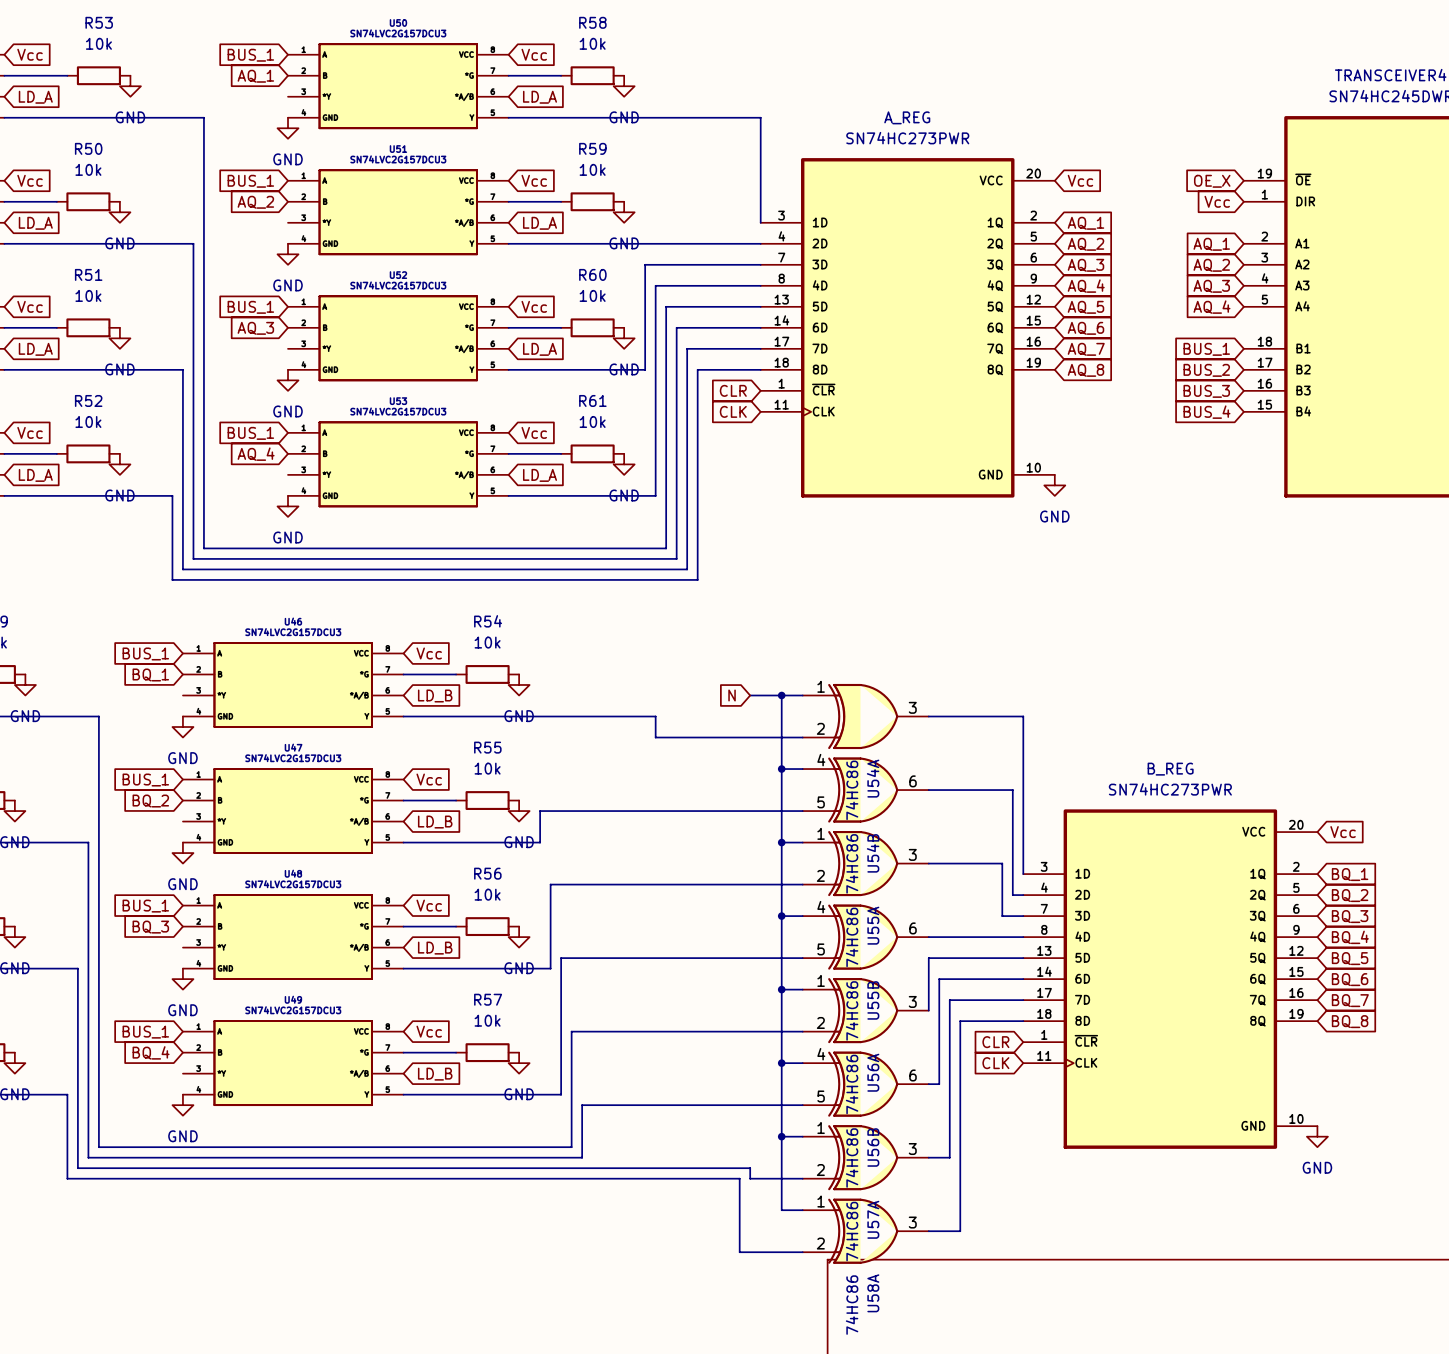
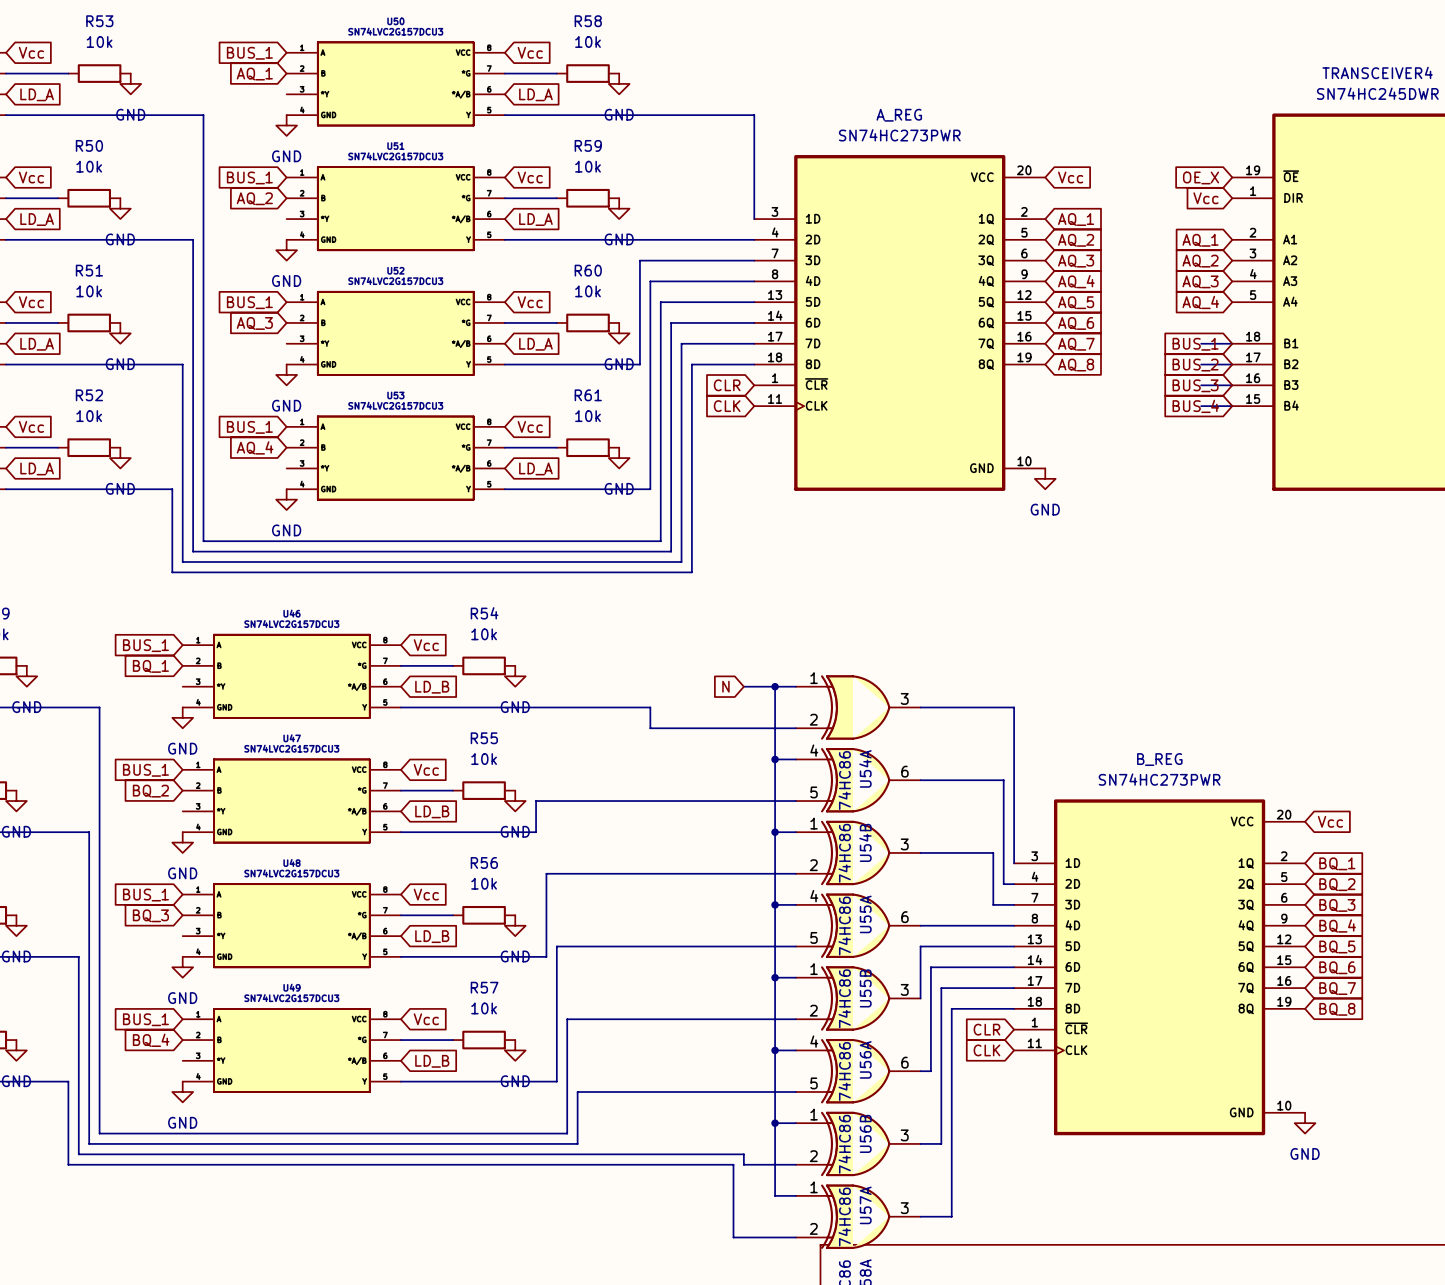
wire: none -> (1201, 343) (1232, 343)
wire: none -> (1201, 364) (1232, 364)
wire: none -> (1201, 385) (1232, 385)
wire: none -> (1201, 406) (1232, 406)

